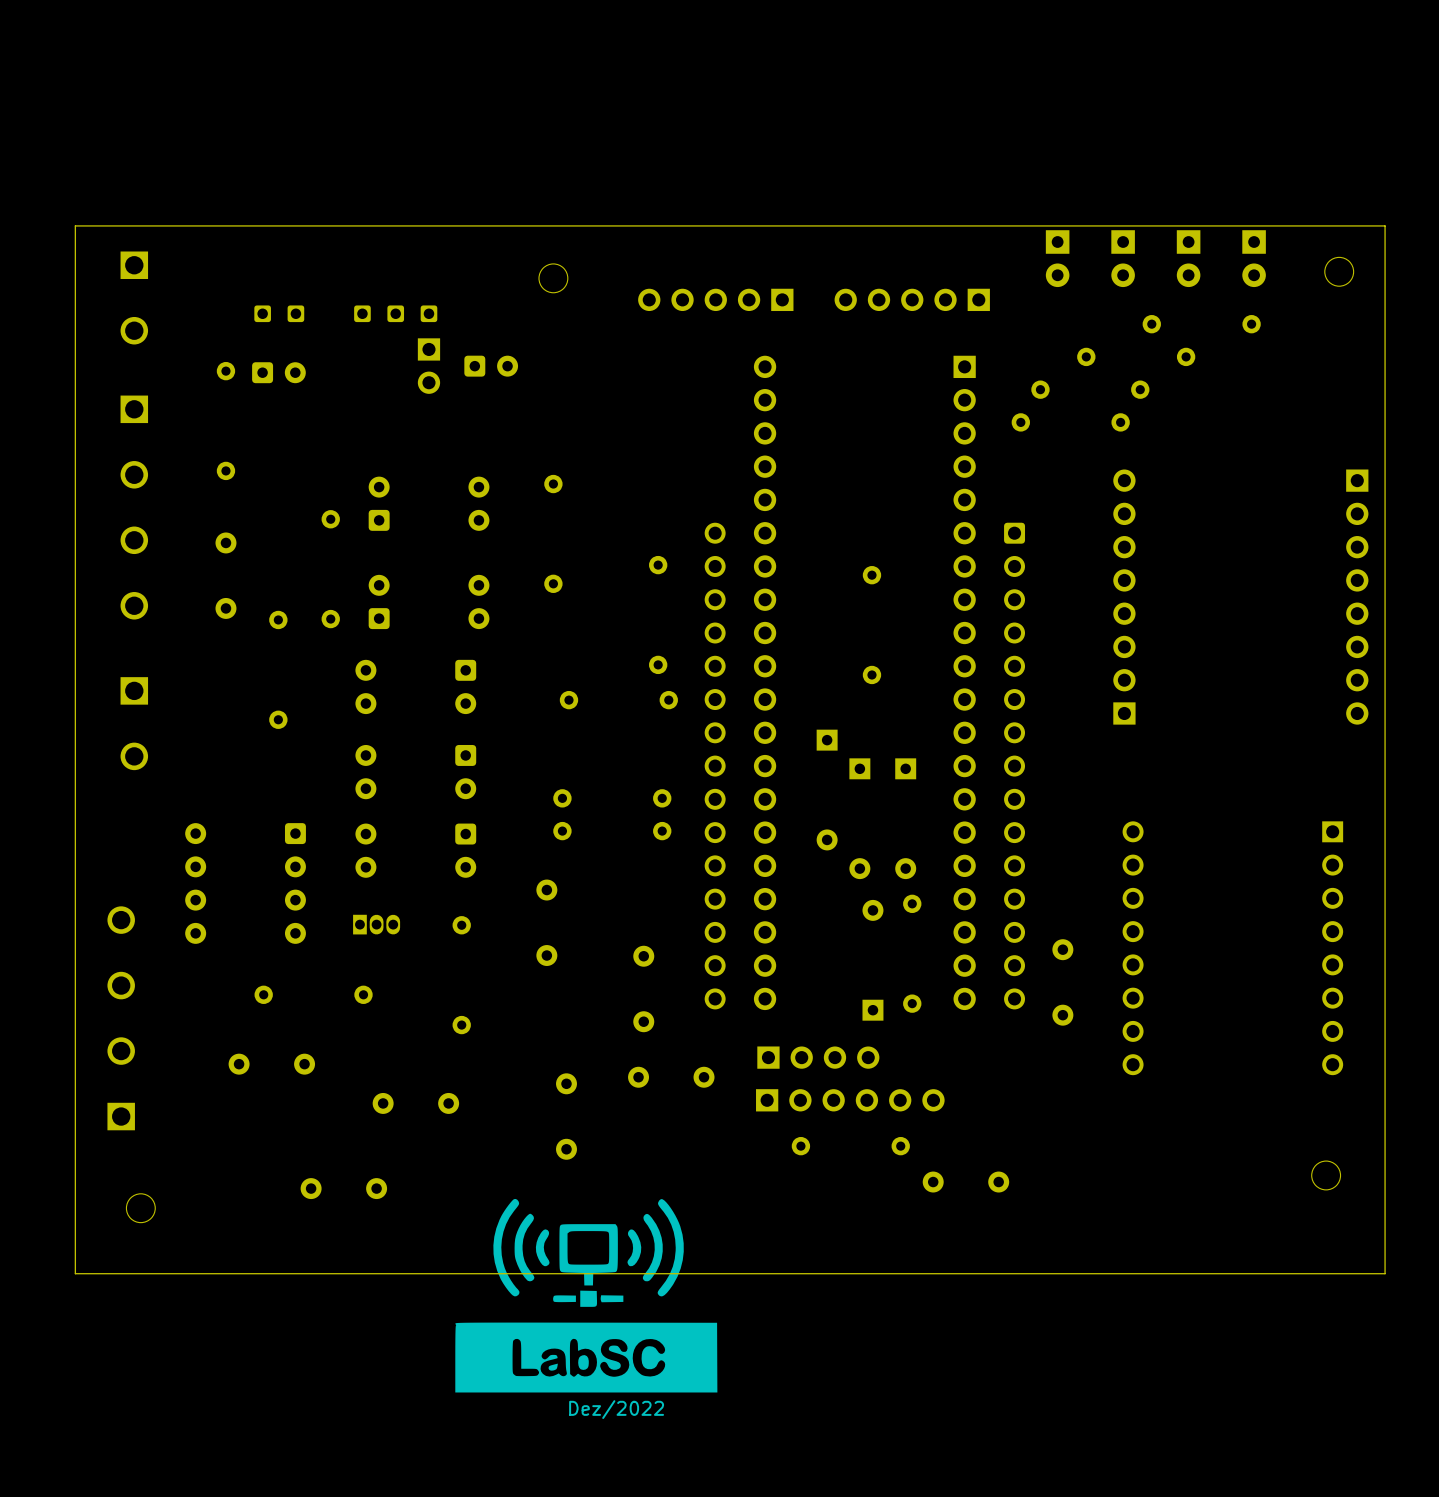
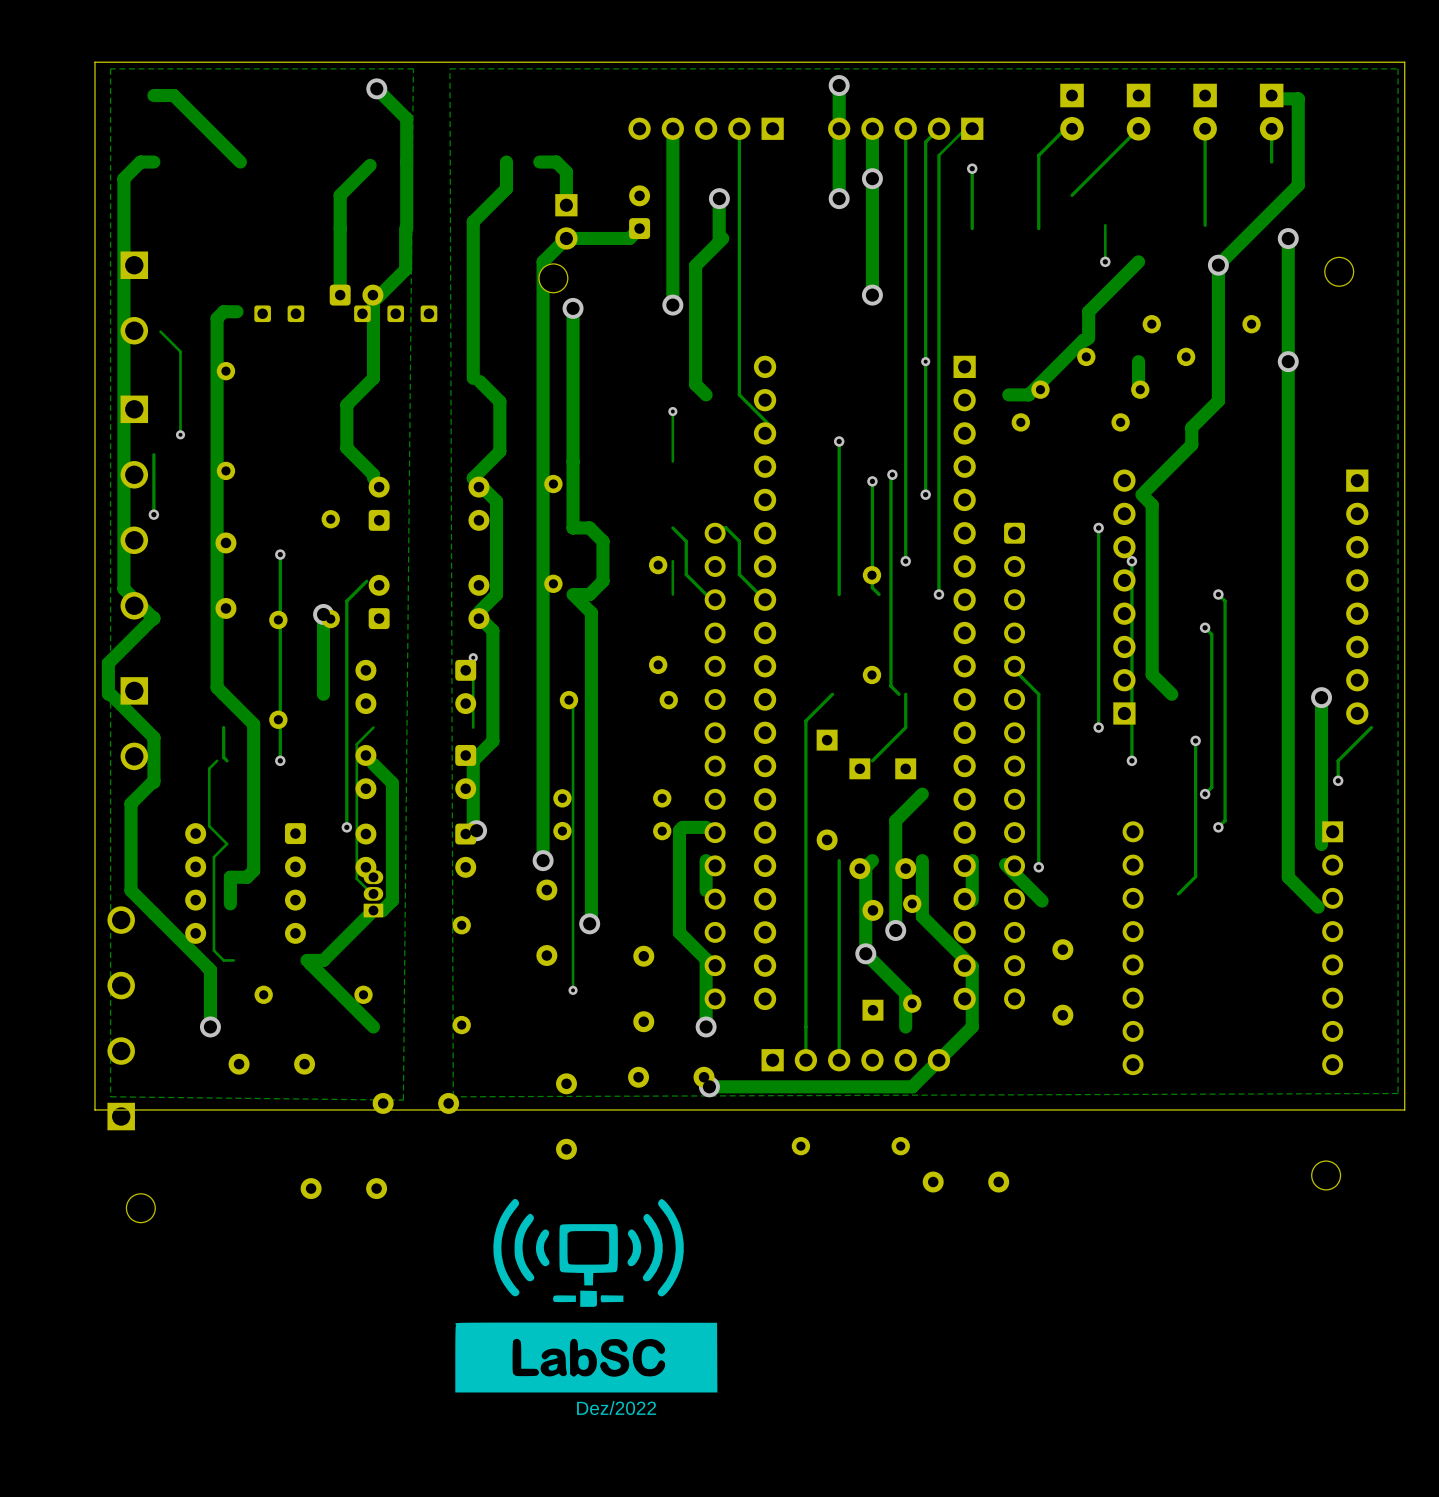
zone outline: none -> (413, 68) (110, 68) (110, 1096) (403, 1100) (413, 68)
zone outline: none -> (1398, 68) (449, 68) (453, 1096) (1398, 1093) (1398, 68)
track: none -> (839, 85) (839, 195) (842, 198)
via: none -> (839, 85)
track: none -> (376, 88) (406, 118) (406, 228)
via: none -> (376, 88)
track: none -> (153, 95) (173, 95) (240, 162)
track: none -> (1274, 95) (1278, 98) (1298, 98) (1298, 185) (1218, 265) (1218, 401) (1191, 427) (1191, 444) (1145, 491)
part: none -> (1072, 112)
part: none -> (1138, 112)
part: none -> (1205, 112)
part: none -> (1271, 112)
track: none -> (672, 128) (672, 305)
part: none -> (706, 128)
track: none -> (739, 128) (739, 394) (772, 428)
track: none -> (872, 128) (872, 295)
part: none -> (905, 128)
track: none -> (1065, 128) (1038, 155) (1038, 228)
track: none -> (1205, 128) (1205, 225)
track: none -> (1271, 128) (1271, 162)
track: none -> (905, 135) (905, 561)
track: none -> (932, 135) (925, 142) (925, 494)
track: none -> (965, 135) (972, 128) (965, 128) (938, 155) (938, 594)
track: none -> (1138, 135) (1131, 135) (1072, 195)
track: none -> (153, 162) (140, 162) (123, 178) (123, 588) (153, 618)
track: none -> (506, 162) (506, 188) (473, 221) (473, 378)
track: none -> (539, 162) (556, 162) (566, 172) (566, 201)
track: none -> (370, 165) (340, 195) (340, 295)
track: none -> (972, 168) (972, 228)
via: none -> (972, 168)
via: none -> (872, 178)
track: none -> (719, 198) (719, 240)
via: none -> (719, 198)
via: none -> (839, 198)
part: none -> (639, 212)
track: none -> (1105, 225) (1105, 261)
board edge: (1385, 225) (75, 225) (75, 1273) (1385, 1273) (1385, 225) -> (1404, 62) (95, 62) (95, 1109) (1404, 1109) (1404, 62)
track: none -> (405, 228) (405, 269) (376, 298)
track: none -> (639, 228) (629, 238) (566, 238) (543, 261) (543, 860)
track: none -> (722, 238) (695, 265) (695, 384) (706, 394)
track: none -> (1288, 238) (1288, 877) (1318, 907)
via: none -> (1288, 238)
part: (1057, 258) -> none
part: (1123, 258) -> none
part: (1188, 258) -> none
part: (1254, 258) -> none
via: none -> (1105, 261)
track: none -> (1138, 261) (1088, 311) (1088, 338)
via: none -> (1218, 265)
part: none -> (356, 295)
track: none -> (373, 295) (373, 378) (346, 404) (346, 448) (373, 474) (373, 478)
via: none -> (872, 295)
part: (715, 299) -> none
part: (912, 299) -> none
via: none -> (672, 305)
track: none -> (573, 308) (573, 527) (589, 527) (602, 541) (602, 581) (589, 594) (576, 594)
via: none -> (573, 308)
track: none -> (237, 311) (223, 311) (217, 318) (217, 687) (253, 724) (253, 870) (247, 877) (230, 877) (230, 903)
track: none -> (160, 331) (180, 351) (180, 434)
track: none -> (1085, 340) (1028, 394) (1008, 394)
via: none -> (925, 361)
track: none -> (1138, 361) (1138, 391)
via: none -> (1288, 361)
part position: (428, 366) -> (566, 221)
part: (491, 366) -> none
part: (278, 372) -> none
track: none -> (479, 381) (499, 401) (499, 451) (473, 478) (496, 501) (496, 594) (479, 611)
track: none -> (672, 411) (672, 461)
via: none -> (672, 411)
via: none -> (180, 434)
track: none -> (839, 441) (839, 594)
via: none -> (839, 441)
track: none -> (153, 454) (153, 514)
track: none -> (892, 474) (890, 686) (899, 694)
via: none -> (892, 474)
track: none -> (872, 481) (872, 587) (879, 594)
via: none -> (872, 481)
via: none -> (925, 494)
track: none -> (1141, 494) (1152, 504) (1152, 674) (1171, 694)
via: none -> (153, 514)
track: none -> (672, 527) (686, 541) (686, 574) (706, 594)
track: none -> (712, 527) (726, 527) (739, 541) (739, 574) (759, 594) (772, 594)
track: none -> (1098, 527) (1098, 727)
via: none -> (1098, 527)
track: none -> (280, 554) (280, 760)
via: none -> (280, 554)
track: none -> (672, 561) (672, 594)
via: none -> (905, 561)
track: none -> (1131, 561) (1131, 760)
via: none -> (1131, 561)
track: none -> (366, 581) (346, 601) (346, 827)
track: none -> (573, 594) (591, 612) (591, 922) (589, 923)
via: none -> (938, 594)
track: none -> (1218, 594) (1225, 601) (1225, 820) (1218, 827)
via: none -> (1218, 594)
track: none -> (323, 614) (323, 694)
via: none -> (323, 614)
track: none -> (476, 614) (492, 630) (492, 741) (473, 760) (473, 827) (476, 830)
track: none -> (153, 617) (108, 663) (108, 694)
track: none -> (1205, 627) (1211, 634) (1211, 787) (1205, 794)
via: none -> (1205, 627)
track: none -> (473, 657) (473, 727)
via: none -> (473, 657)
track: none -> (1005, 661) (1038, 694) (1038, 867)
track: none -> (110, 694) (153, 737) (153, 782)
track: none -> (573, 694) (573, 990)
track: none -> (832, 694) (805, 720) (805, 1060)
track: none -> (905, 694) (905, 727) (872, 760)
track: none -> (1321, 697) (1321, 844)
via: none -> (1321, 697)
track: none -> (223, 727) (223, 757) (227, 760)
track: none -> (373, 727) (356, 744) (356, 878) (373, 893)
via: none -> (1098, 727)
track: none -> (1371, 727) (1338, 760) (1338, 780)
track: none -> (1195, 740) (1195, 876) (1178, 893)
via: none -> (1195, 740)
track: none -> (217, 760) (209, 768) (209, 826) (227, 843) (213, 857) (213, 950) (223, 960) (233, 960)
via: none -> (280, 760)
via: none -> (1131, 760)
track: none -> (373, 764) (392, 783) (392, 900) (382, 910) (373, 910)
track: none -> (153, 780) (131, 803) (131, 890) (210, 970)
via: none -> (1338, 780)
track: none -> (922, 794) (895, 820) (895, 930)
via: none -> (1205, 794)
via: none -> (346, 827)
track: none -> (706, 827) (682, 827) (679, 830) (679, 932) (706, 959) (706, 1026)
via: none -> (1218, 827)
via: none -> (476, 830)
via: none -> (543, 860)
track: none -> (706, 860) (706, 890)
track: none -> (839, 860) (839, 1060)
track: none -> (872, 860) (865, 867) (865, 953) (905, 993) (905, 1026)
track: none -> (922, 860) (922, 916) (972, 966) (972, 1026) (942, 1056)
track: none -> (972, 860) (972, 900)
track: none -> (1005, 860) (1005, 864) (1042, 901)
via: none -> (1038, 867)
track: none -> (370, 913) (323, 960) (306, 960)
via: none -> (589, 923)
part rotation: 0° (376, 924) -> 90° counterclockwise (373, 893)
part position: (376, 924) -> (373, 893)
via: none -> (895, 930)
via: none -> (865, 953)
track: none -> (310, 960) (310, 963) (373, 1026)
track: none -> (207, 967) (210, 970) (210, 1026)
via: none -> (573, 990)
via: none -> (210, 1026)
via: none -> (706, 1026)
part: (818, 1057) -> none
track: none -> (938, 1060) (912, 1086) (709, 1086)
via: none -> (709, 1086)
part position: (850, 1100) -> (855, 1060)

